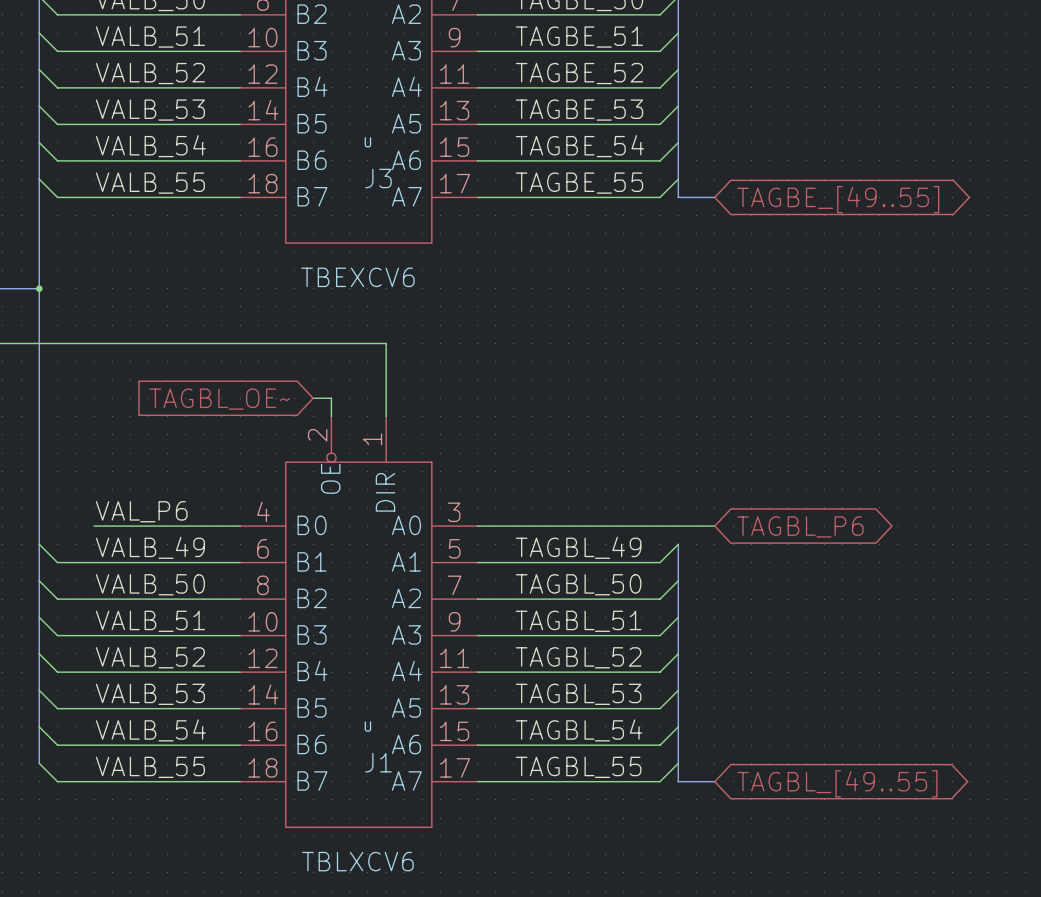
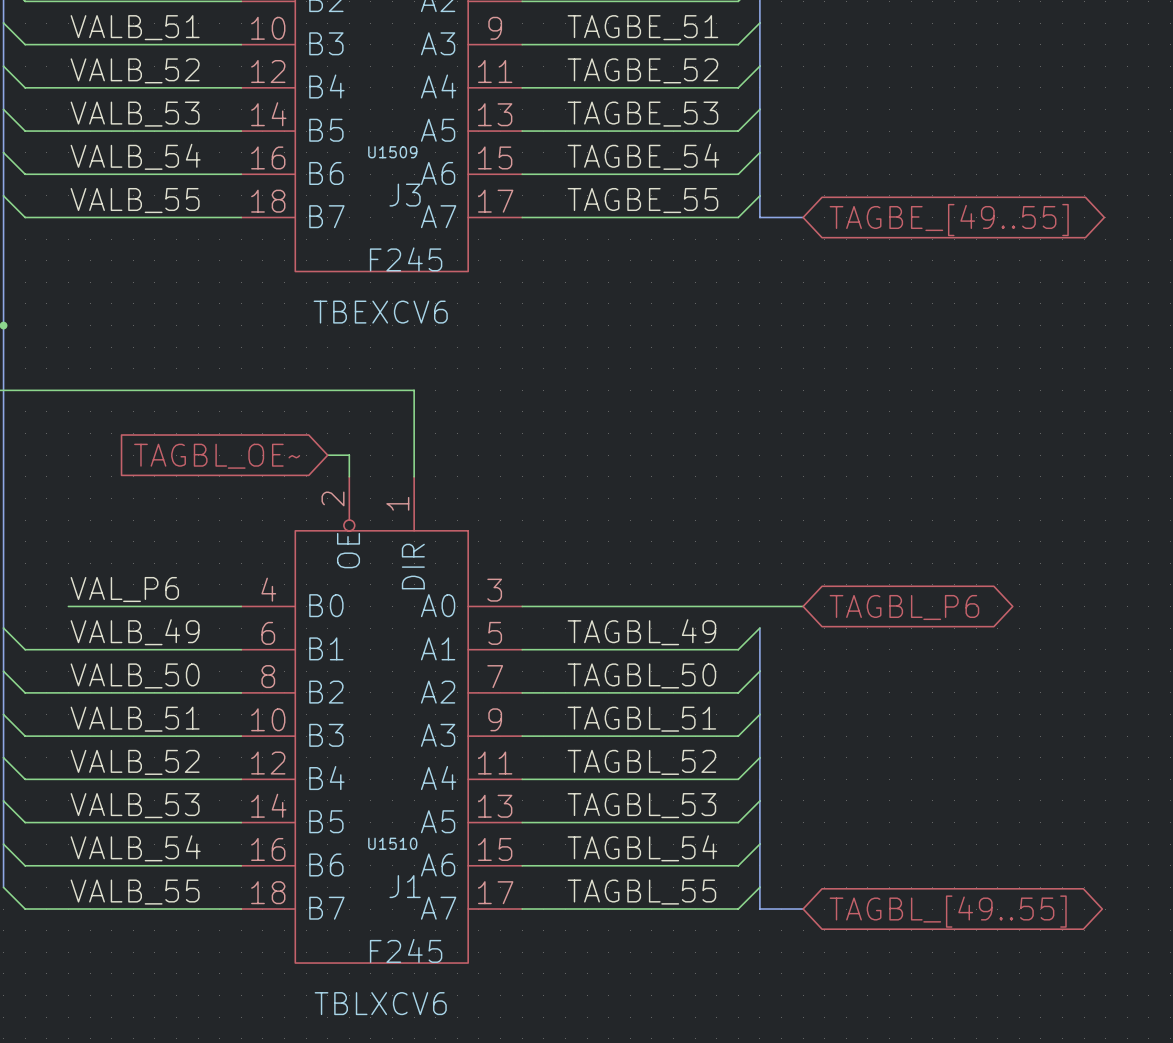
U name: U (367, 142) -> U1509 (392, 152)
U value: none -> F245 (406, 259)
U name: U (367, 726) -> U1510 (392, 843)
U value: none -> F245 (406, 950)

